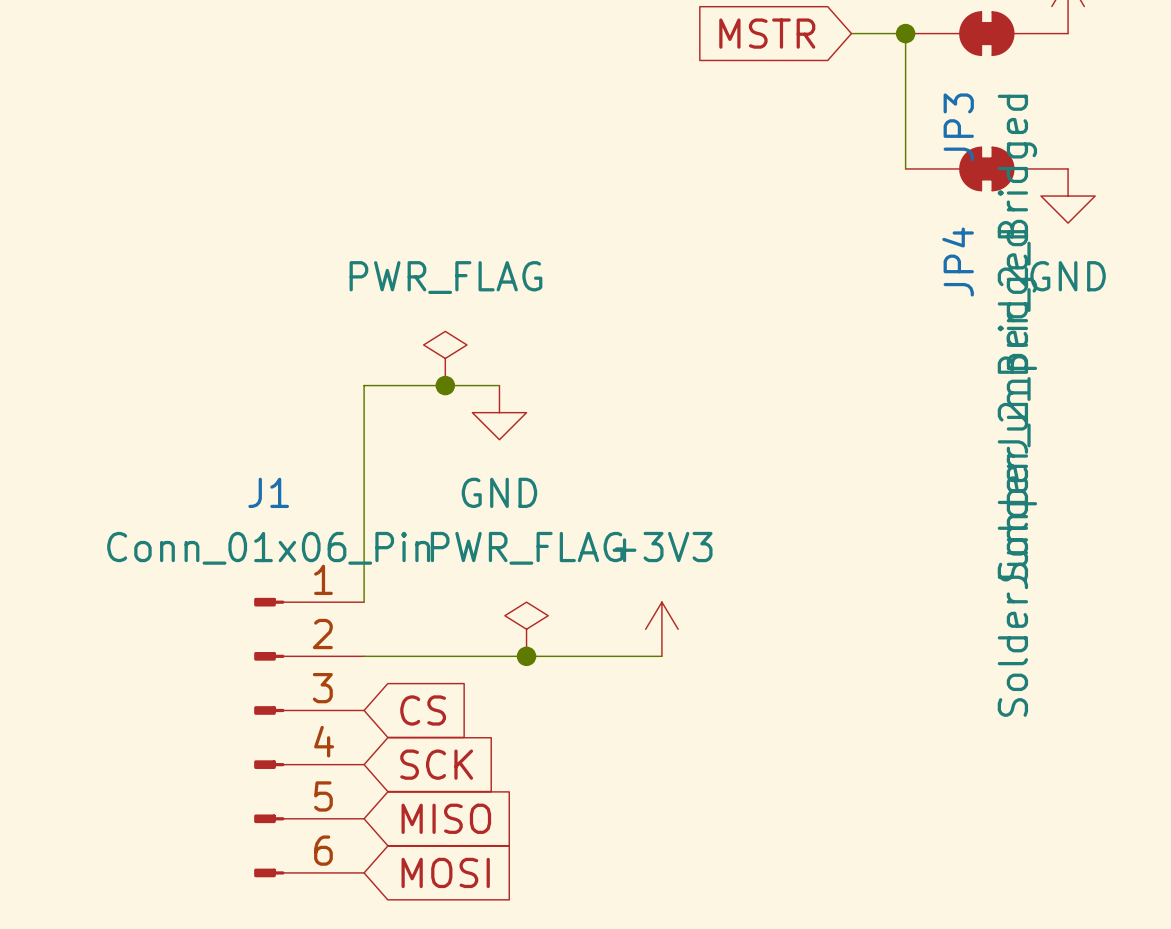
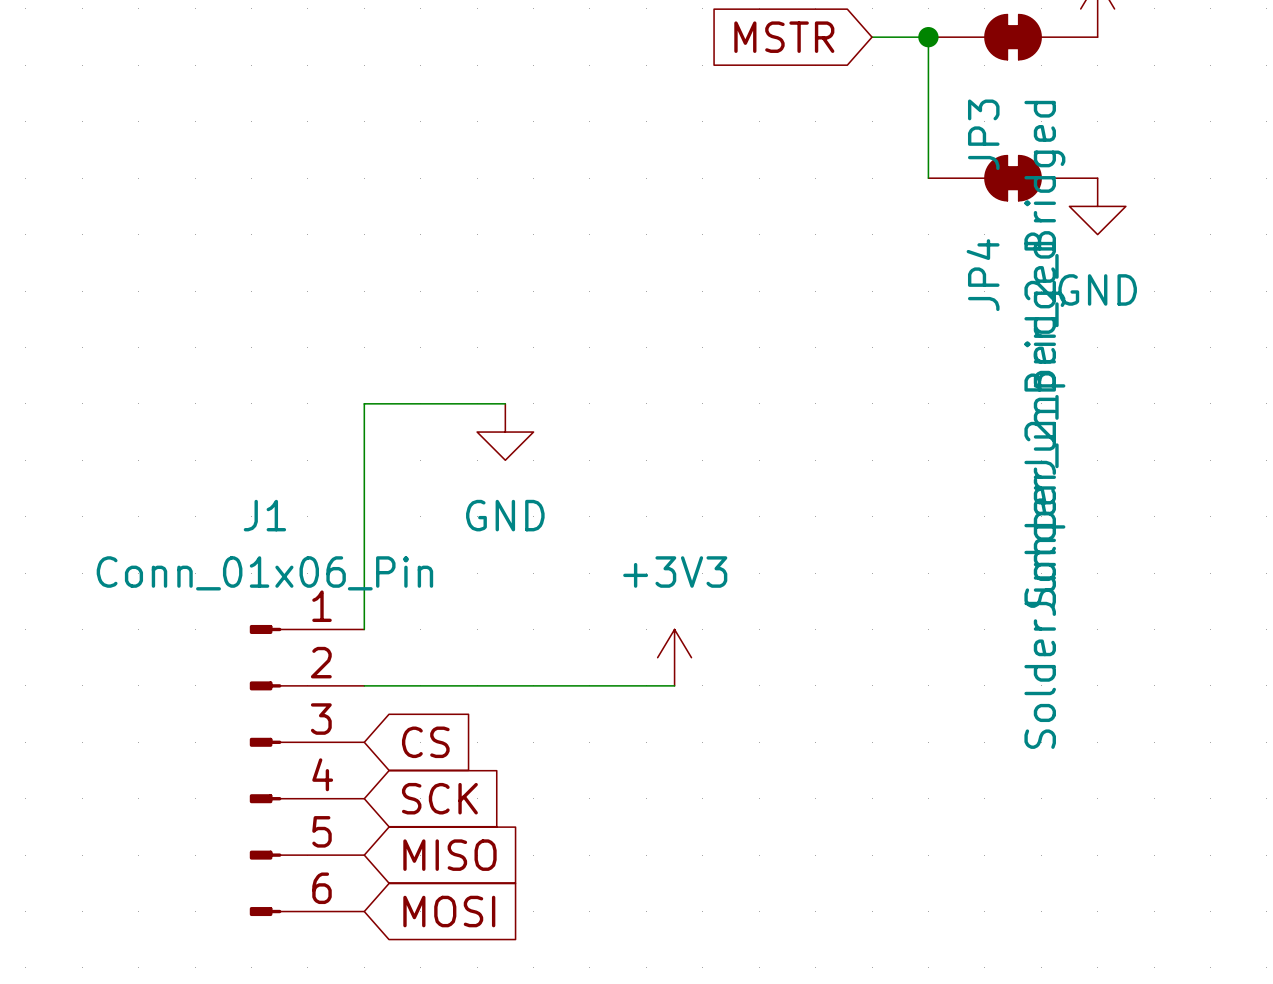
power symbol: PWR_FLAG (445, 358) -> none
junction: (445, 385) -> none
power symbol: PWR_FLAG (526, 629) -> none
junction: (526, 656) -> none

